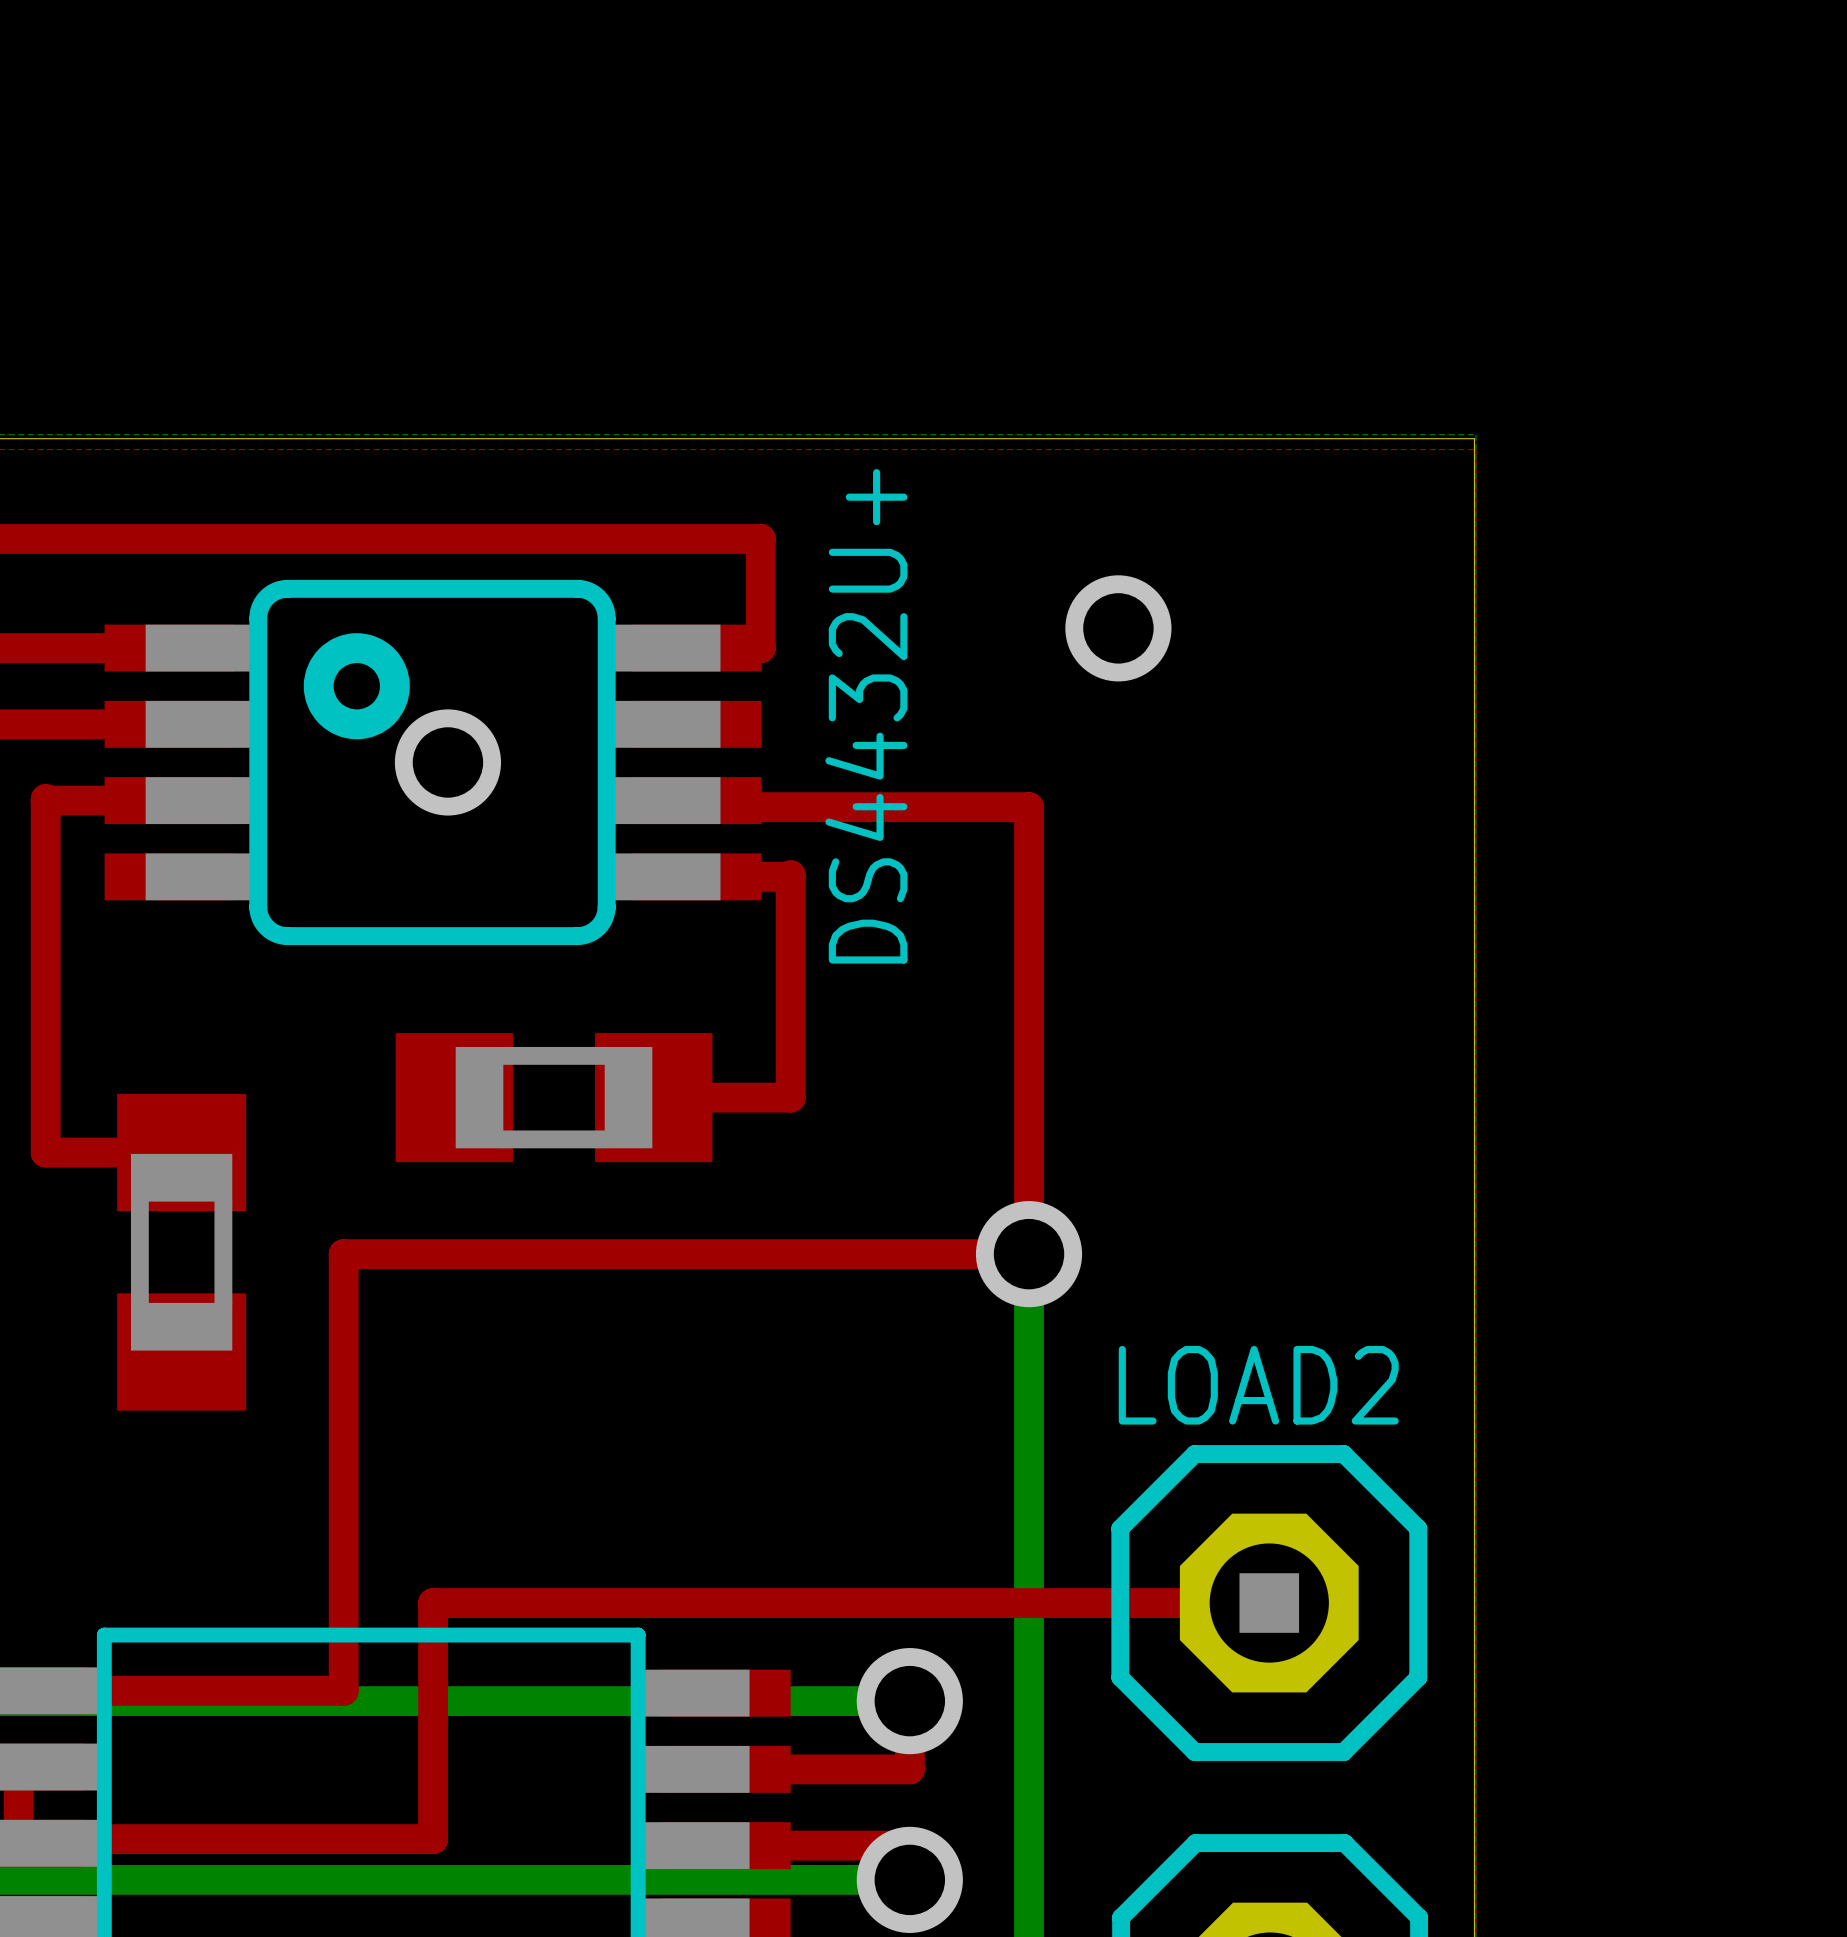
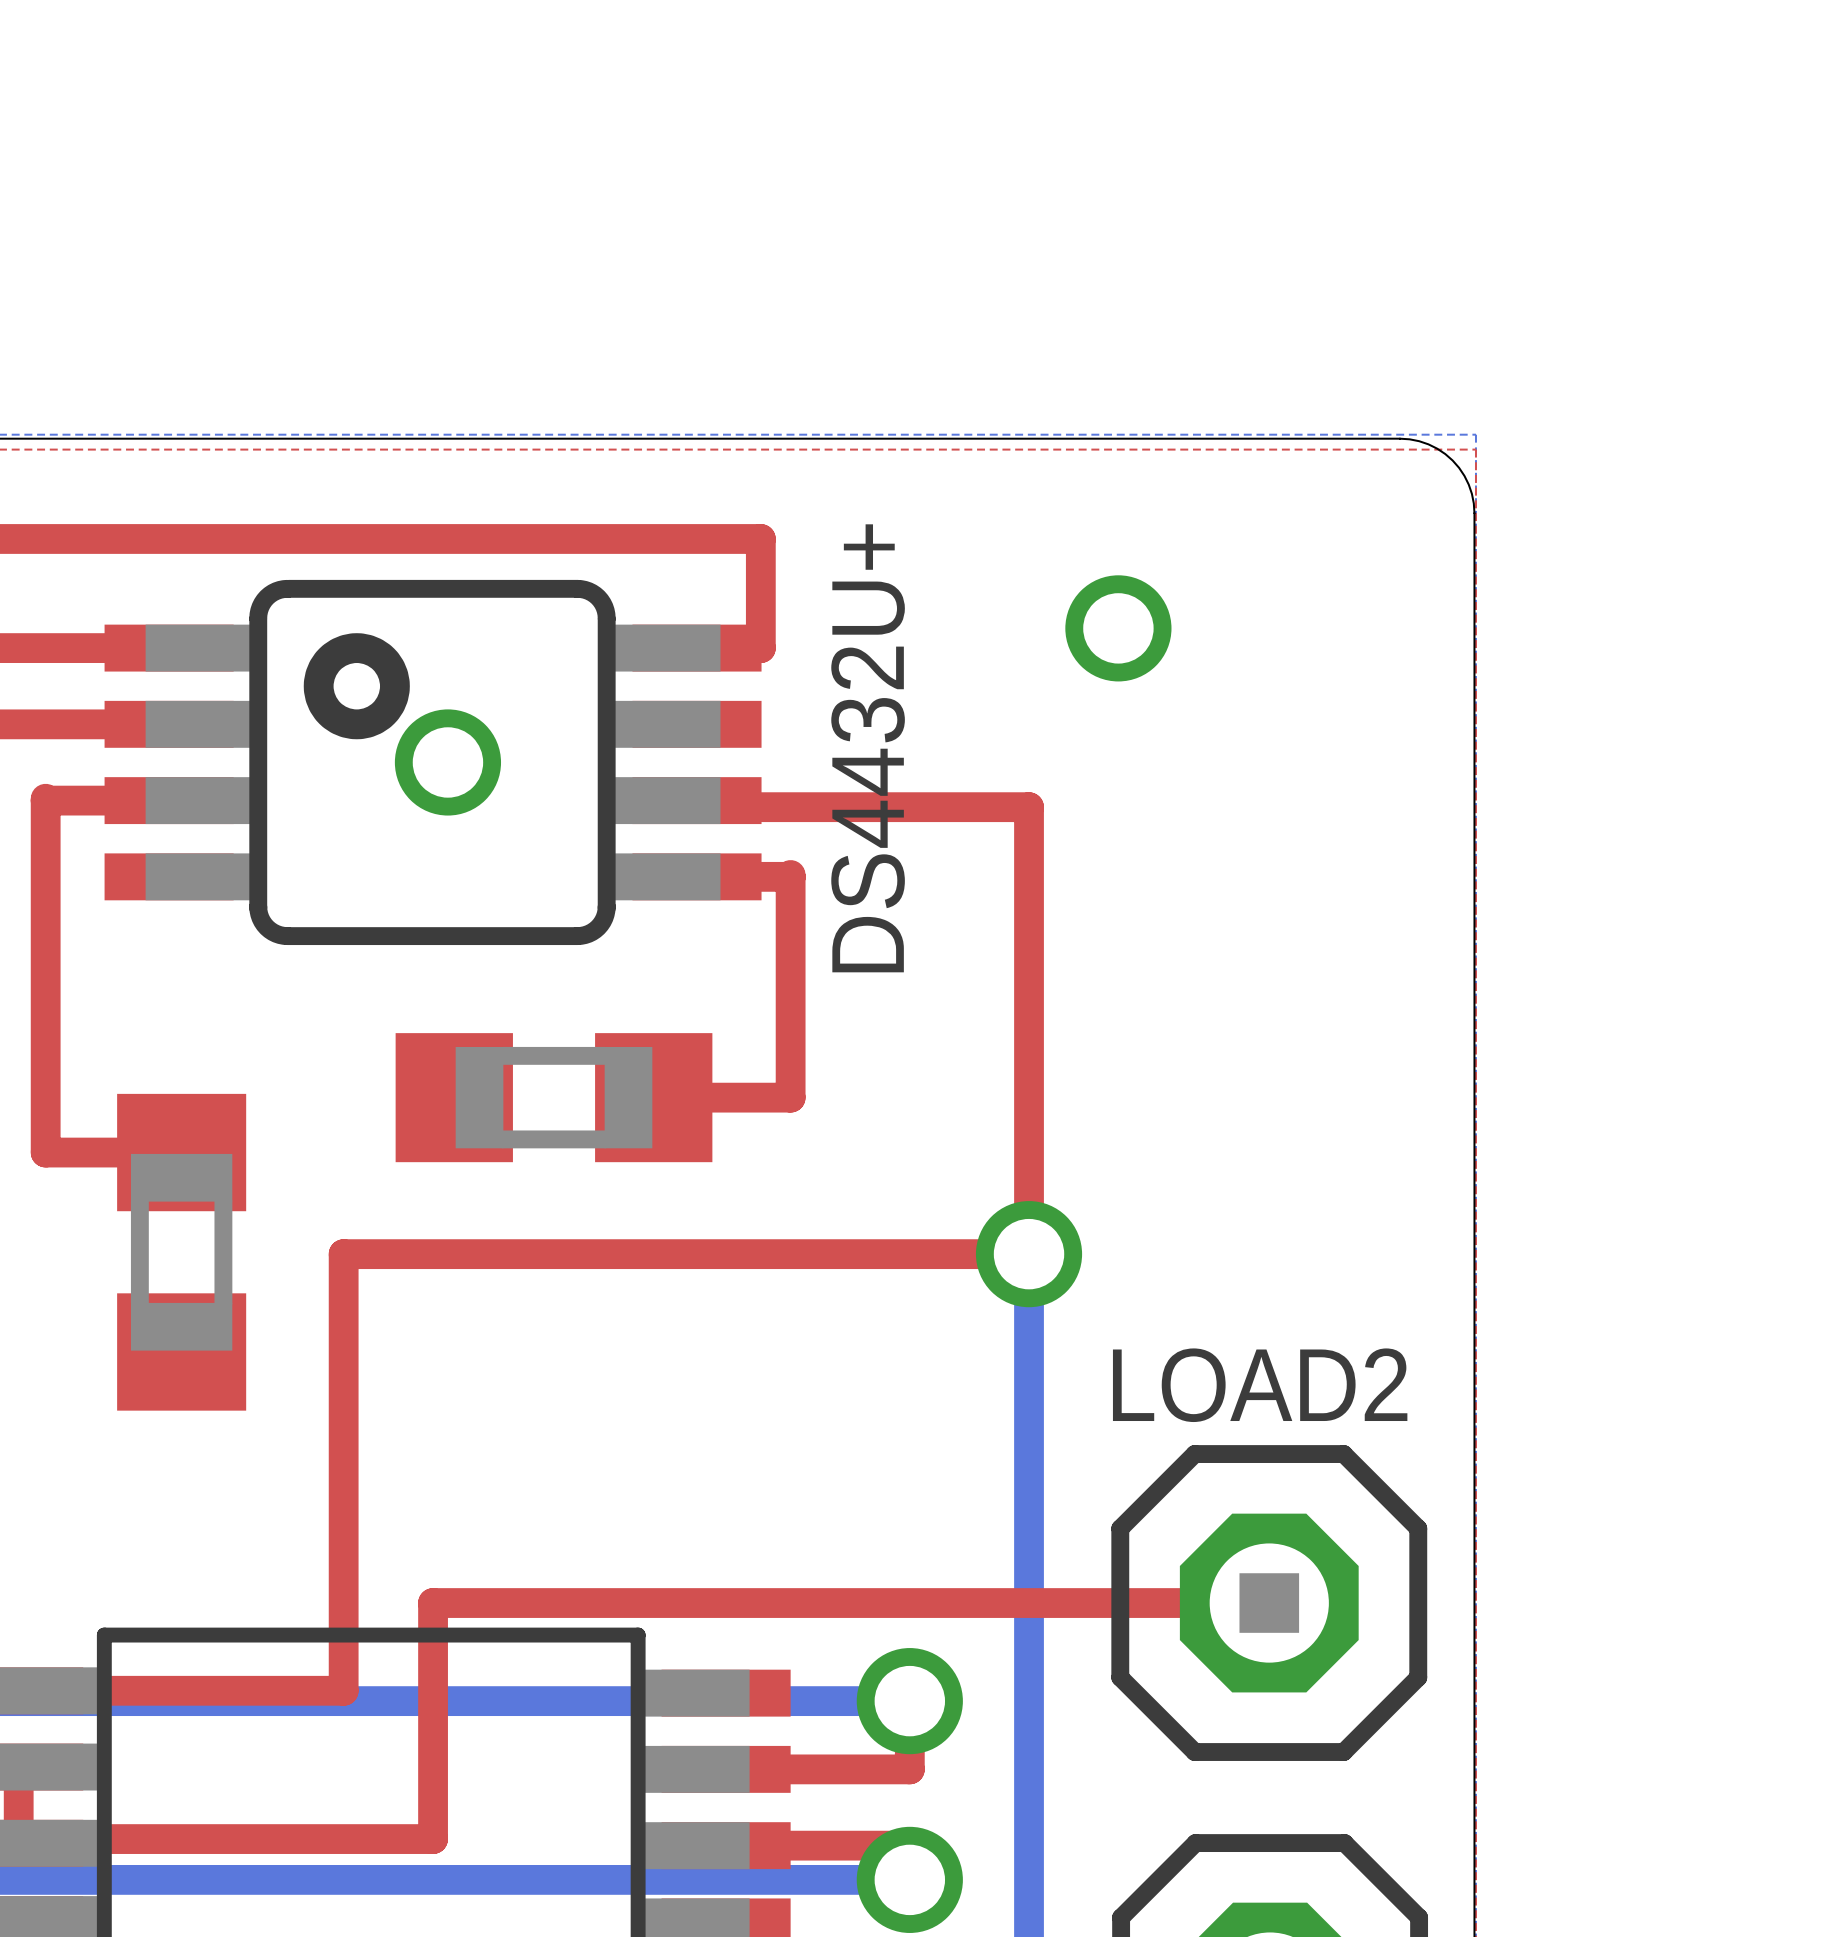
board edge: (1399, 438) (1474, 438) (1474, 513) -> (1399, 438) (1428, 444) (1452, 460) (1468, 484) (1474, 513)

